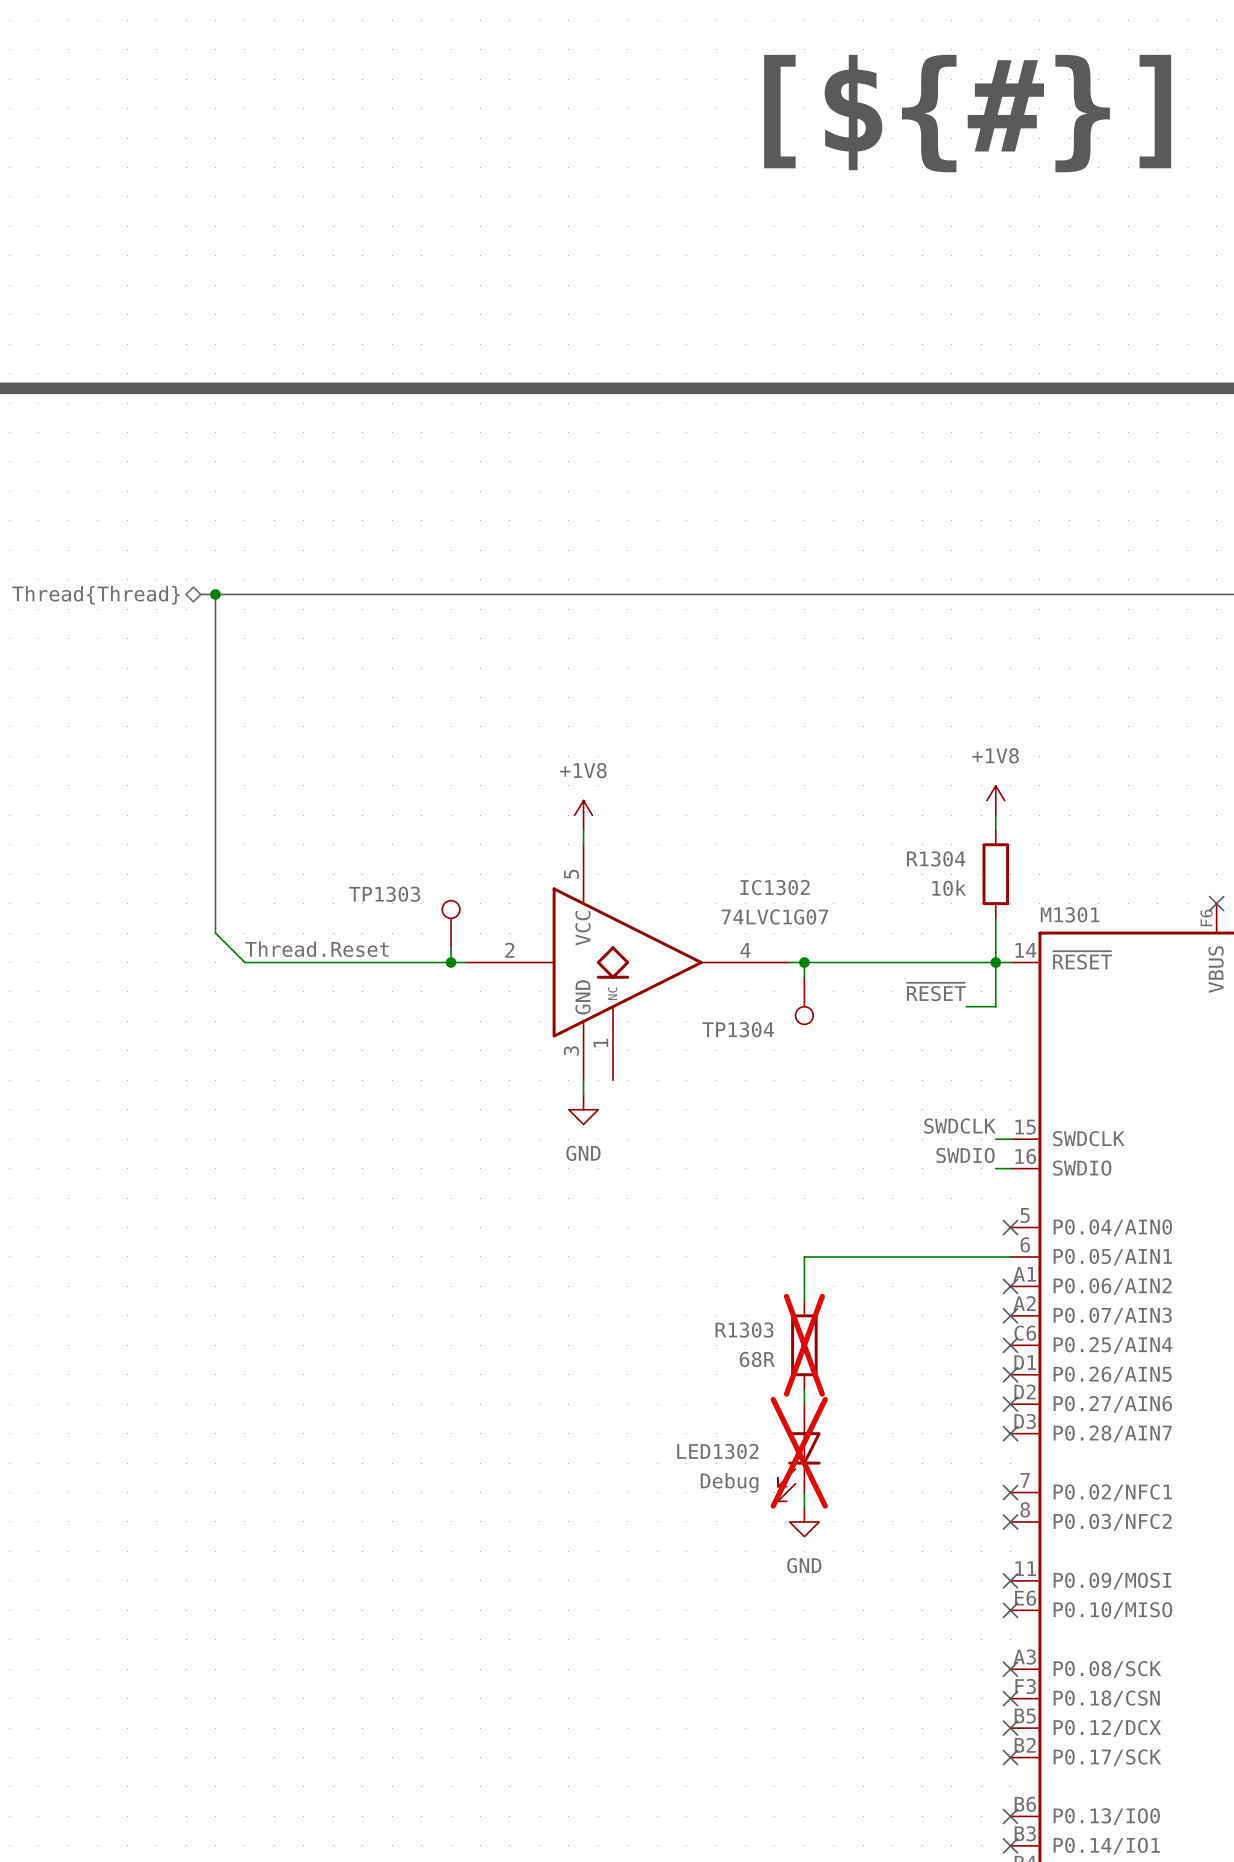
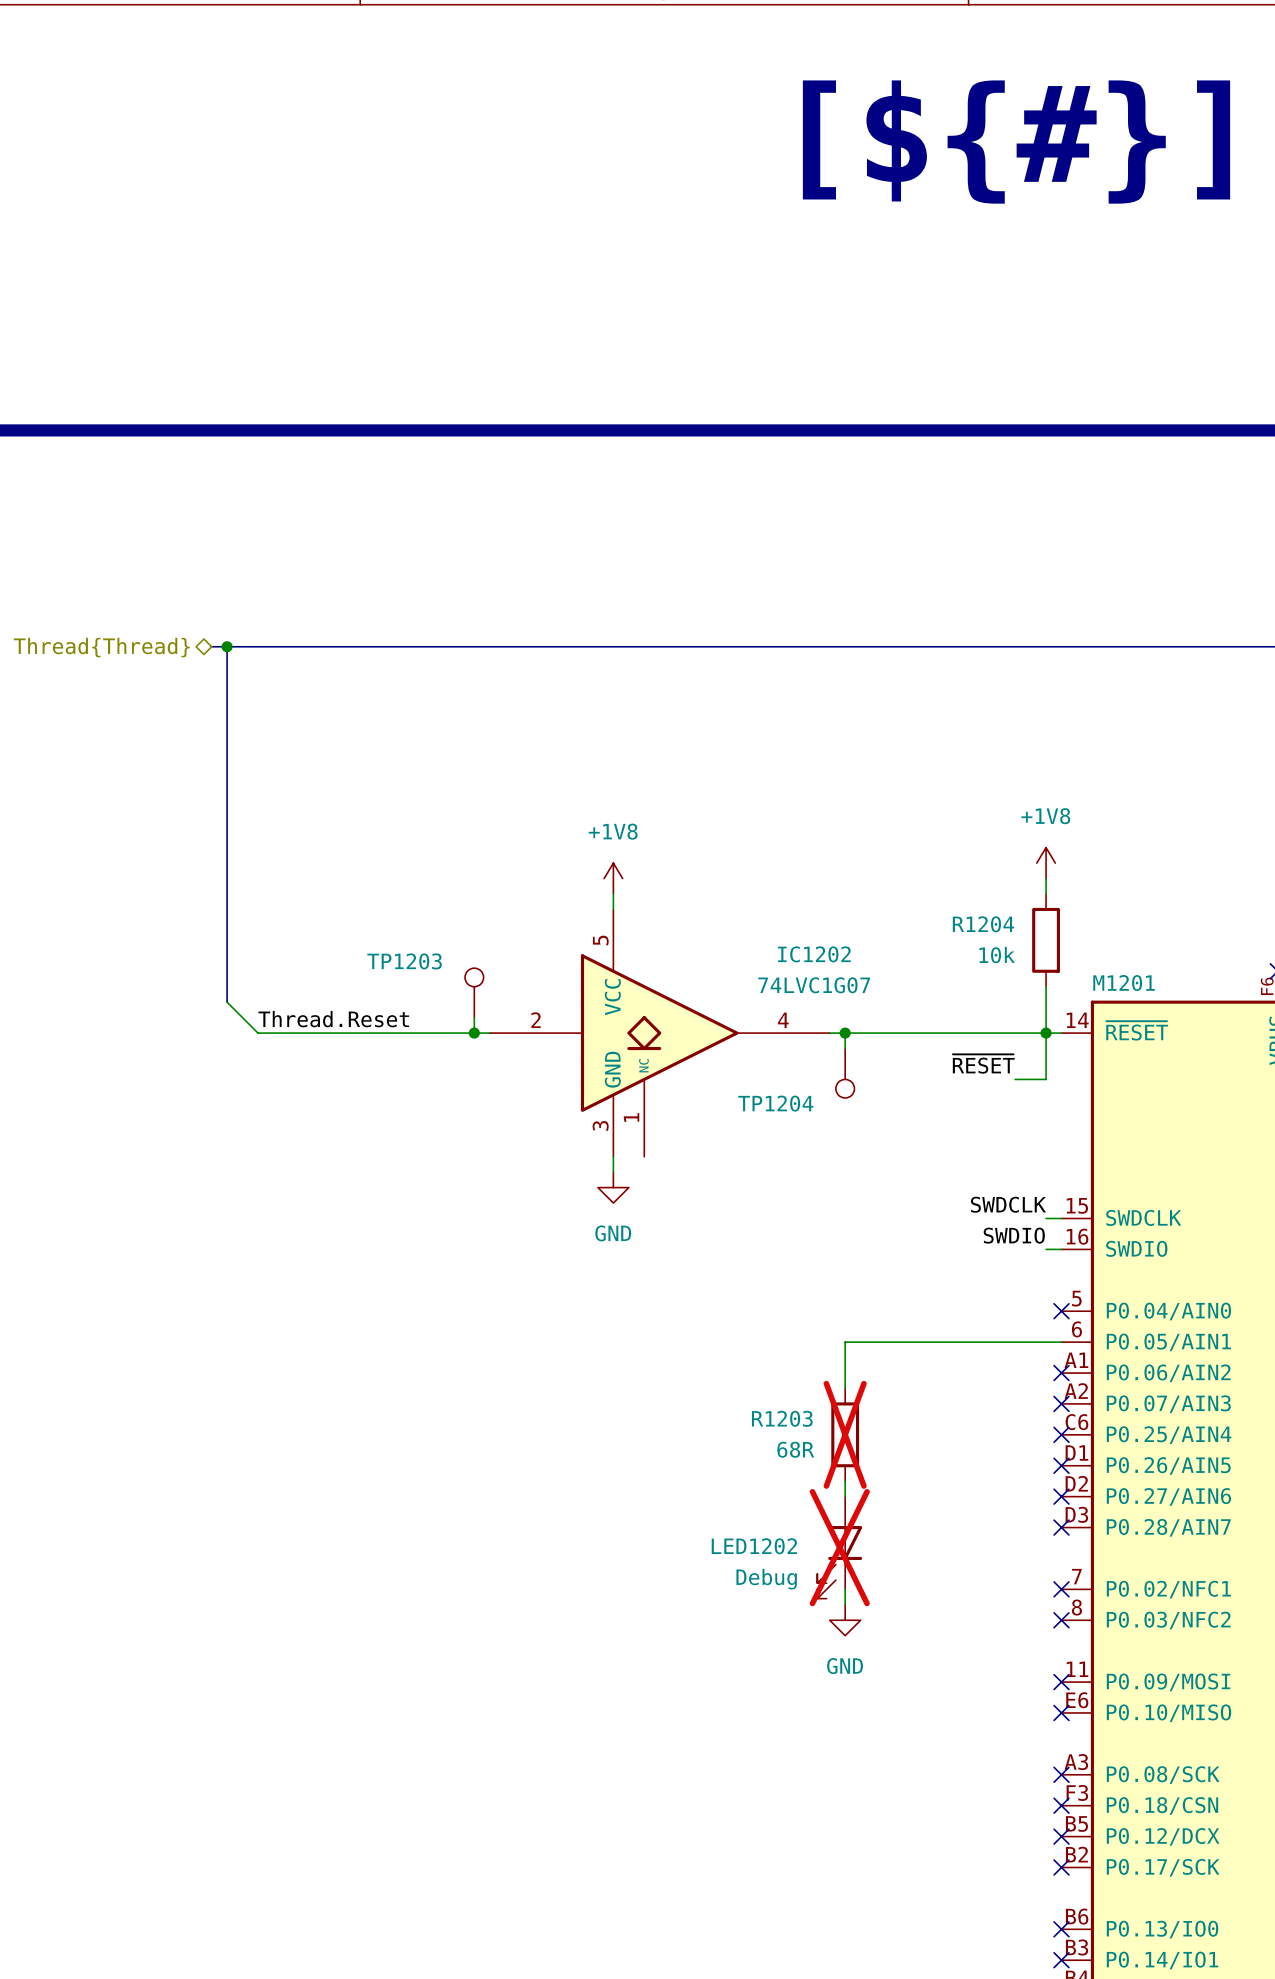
R1304 name: R1304 (936, 858) -> R1204 (983, 924)
IC1302 name: IC1302 (775, 887) -> IC1202 (814, 954)
TP1303 name: TP1303 (384, 894) -> TP1203 (404, 961)
M1301 name: M1301 (1070, 914) -> M1201 (1124, 983)
TP1304 name: TP1304 (738, 1029) -> TP1204 (775, 1103)
R1303 name: R1303 (744, 1330) -> R1203 (782, 1418)
LED1302 name: LED1302 (717, 1451) -> LED1202 (754, 1546)

